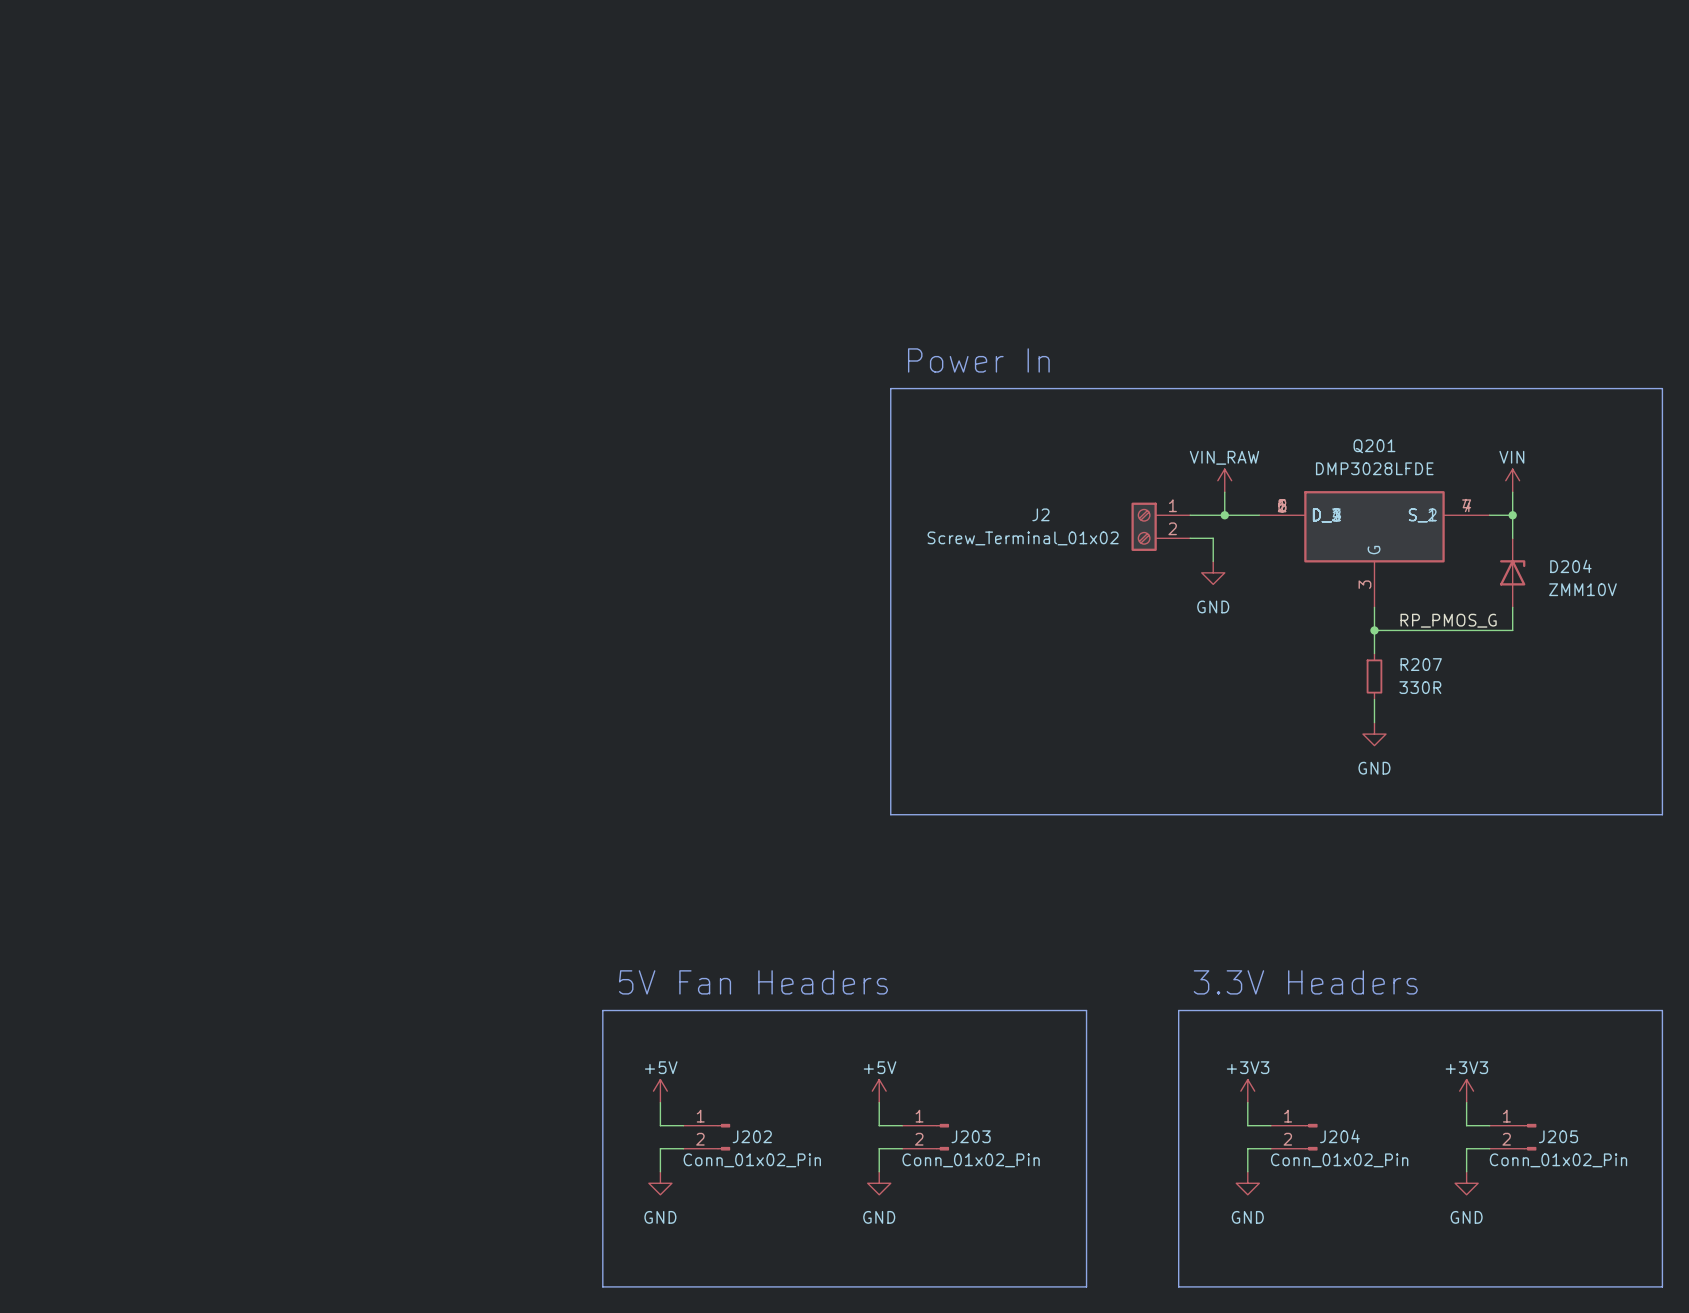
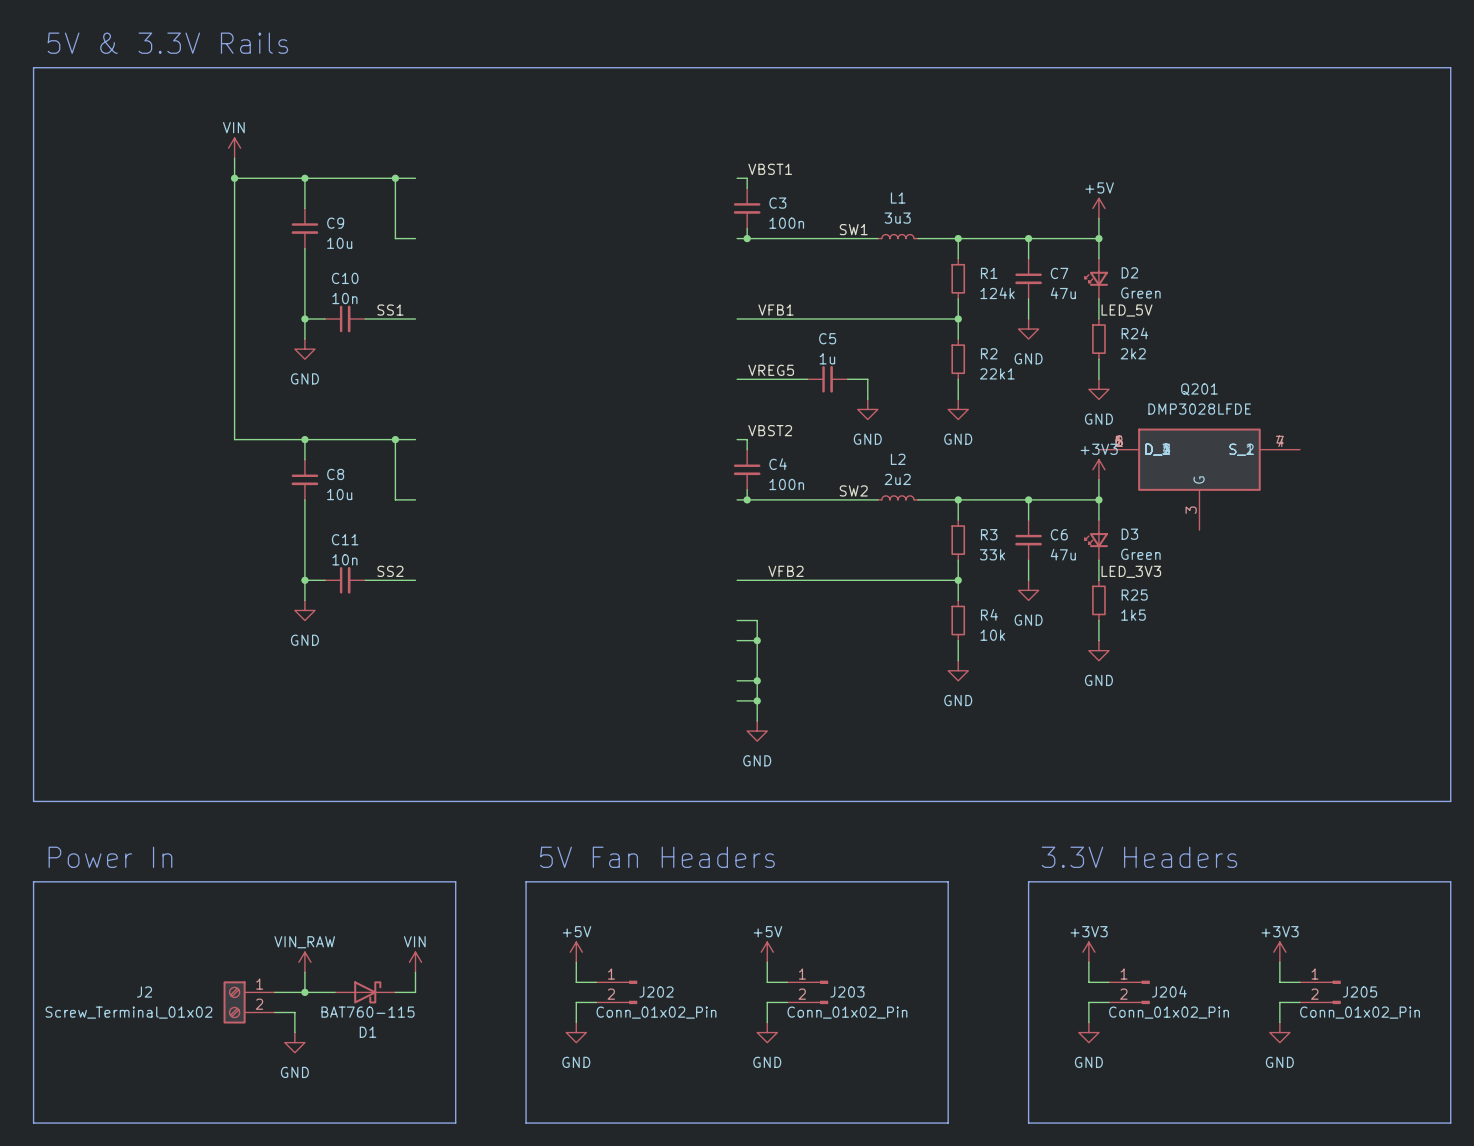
text: none -> 5V & 3.3V Rails (167, 43)
power symbol: none -> VIN (234, 148)
wire: none -> (234, 158) (234, 439) (415, 439)
label: none -> VBST1 (770, 169)
wire: none -> (234, 178) (415, 178)
junction: none -> (234, 178)
wire: none -> (304, 178) (304, 208)
junction: none -> (304, 178)
wire: none -> (395, 178) (395, 238) (415, 238)
junction: none -> (395, 178)
wire: none -> (737, 178) (747, 178) (747, 188)
C3: none -> 100n (747, 208)
power symbol: none -> +5V (1098, 208)
wire: none -> (1098, 218) (1098, 258)
C9: none -> 10u (304, 228)
wire: none -> (747, 228) (747, 238)
label: none -> SW1 (853, 229)
L1: none -> 3u3 (897, 236)
wire: none -> (737, 238) (877, 238)
junction: none -> (747, 238)
wire: none -> (918, 238) (1098, 238)
wire: none -> (958, 238) (958, 258)
junction: none -> (958, 238)
wire: none -> (1028, 238) (1028, 258)
junction: none -> (1028, 238)
junction: none -> (1098, 238)
wire: none -> (304, 248) (304, 339)
R1: none -> 124k (958, 278)
C7: none -> 47u (1028, 278)
D2: none -> Green (1096, 278)
wire: none -> (958, 298) (958, 339)
wire: none -> (1028, 298) (1028, 318)
wire: none -> (1098, 298) (1098, 318)
label: none -> SS1 (390, 310)
label: none -> VFB1 (775, 310)
label: none -> LED_5V (1127, 310)
text: Power In (978, 360) -> none
wire: none -> (304, 318) (325, 318)
junction: none -> (304, 318)
C10: none -> 10n (345, 318)
wire: none -> (365, 318) (415, 318)
wire: none -> (737, 318) (958, 318)
junction: none -> (958, 318)
power symbol: none -> GND (1028, 329)
R24: none -> 2k2 (1098, 339)
line: (1662, 388) (890, 388) (890, 814) (1662, 814) -> (1450, 339) (1450, 67) (33, 67) (33, 801) (1450, 801) (1450, 710)
power symbol: none -> GND (304, 349)
R2: none -> 22k1 (958, 359)
label: none -> VREG5 (771, 370)
wire: none -> (737, 379) (807, 379)
C5: none -> 1u (827, 379)
wire: none -> (847, 379) (867, 379) (867, 399)
wire: none -> (958, 379) (958, 399)
power symbol: none -> GND (1098, 389)
power symbol: none -> GND (867, 409)
power symbol: none -> GND (958, 409)
power symbol: VIN_RAW (1224, 480) -> none
power symbol: VIN (1512, 480) -> none
wire: (1224, 492) (1224, 515) -> (1098, 359) (1098, 379)
wire: (1512, 492) (1512, 538) -> none
label: none -> VBST2 (770, 430)
wire: none -> (304, 439) (304, 459)
junction: none -> (304, 439)
wire: none -> (395, 439) (395, 499) (415, 499)
junction: none -> (395, 439)
wire: none -> (737, 439) (747, 439) (747, 449)
wire: (1190, 515) (1259, 515) -> none
junction: (1224, 515) -> none
wire: (1489, 515) (1512, 515) -> none
junction: (1512, 515) -> none
J2 position: (1160, 526) -> (249, 1002)
C4: none -> 100n (747, 469)
wire: (1190, 538) (1213, 538) (1213, 561) -> none
power symbol: none -> +3V3 (1098, 469)
C8: none -> 10u (304, 479)
wire: none -> (747, 489) (747, 499)
label: none -> SW2 (853, 490)
L2: none -> 2u2 (897, 497)
wire: none -> (304, 499) (304, 600)
wire: none -> (737, 499) (877, 499)
junction: none -> (747, 499)
wire: none -> (918, 499) (1098, 499)
wire: none -> (958, 499) (958, 520)
junction: none -> (958, 499)
wire: none -> (1028, 499) (1028, 520)
junction: none -> (1028, 499)
power symbol: GND (1213, 572) -> none
junction: none -> (1098, 499)
D204: ZMM10V (1512, 572) -> none
wire: (1374, 607) (1374, 653) -> (1098, 479) (1098, 520)
wire: (1512, 607) (1512, 630) (1374, 630) -> none
R3: none -> 33k (958, 540)
C6: none -> 47u (1028, 540)
D3: none -> Green (1096, 540)
label: RP_PMOS_G (1448, 620) -> none
junction: (1374, 630) -> none
wire: none -> (958, 560) (958, 600)
wire: none -> (1028, 560) (1028, 580)
label: none -> SS2 (390, 571)
label: none -> VFB2 (786, 571)
label: none -> LED_3V3 (1131, 571)
wire: none -> (304, 580) (325, 580)
junction: none -> (304, 580)
C11: none -> 10n (345, 580)
wire: none -> (365, 580) (415, 580)
wire: none -> (737, 580) (958, 580)
junction: none -> (958, 580)
power symbol: none -> GND (1028, 590)
R207: 330R (1374, 676) -> none
R25: none -> 1k5 (1098, 600)
power symbol: none -> GND (304, 610)
wire: (1374, 699) (1374, 722) -> (1098, 560) (1098, 580)
wire: none -> (737, 620) (757, 620) (757, 721)
R4: none -> 10k (958, 620)
wire: none -> (1098, 620) (1098, 640)
wire: none -> (737, 640) (757, 640)
junction: none -> (757, 640)
wire: none -> (958, 640) (958, 660)
power symbol: GND (1374, 734) -> none
power symbol: none -> GND (1098, 650)
power symbol: none -> GND (958, 670)
wire: none -> (737, 680) (757, 680)
junction: none -> (757, 680)
wire: none -> (737, 700) (757, 700)
junction: none -> (757, 700)
power symbol: none -> GND (757, 731)
text: none -> Power In (110, 857)
line: none -> (33, 881) (33, 1123) (455, 1123) (455, 881) (33, 881)
power symbol: none -> VIN_RAW (304, 962)
power symbol: none -> VIN (415, 962)
wire: none -> (304, 972) (304, 992)
wire: none -> (415, 972) (415, 992) (395, 992)
wire: none -> (274, 992) (335, 992)
junction: none -> (304, 992)
D1: none -> BAT760-115 (365, 992)
wire: none -> (274, 1012) (294, 1012) (294, 1032)
power symbol: none -> GND (294, 1042)

